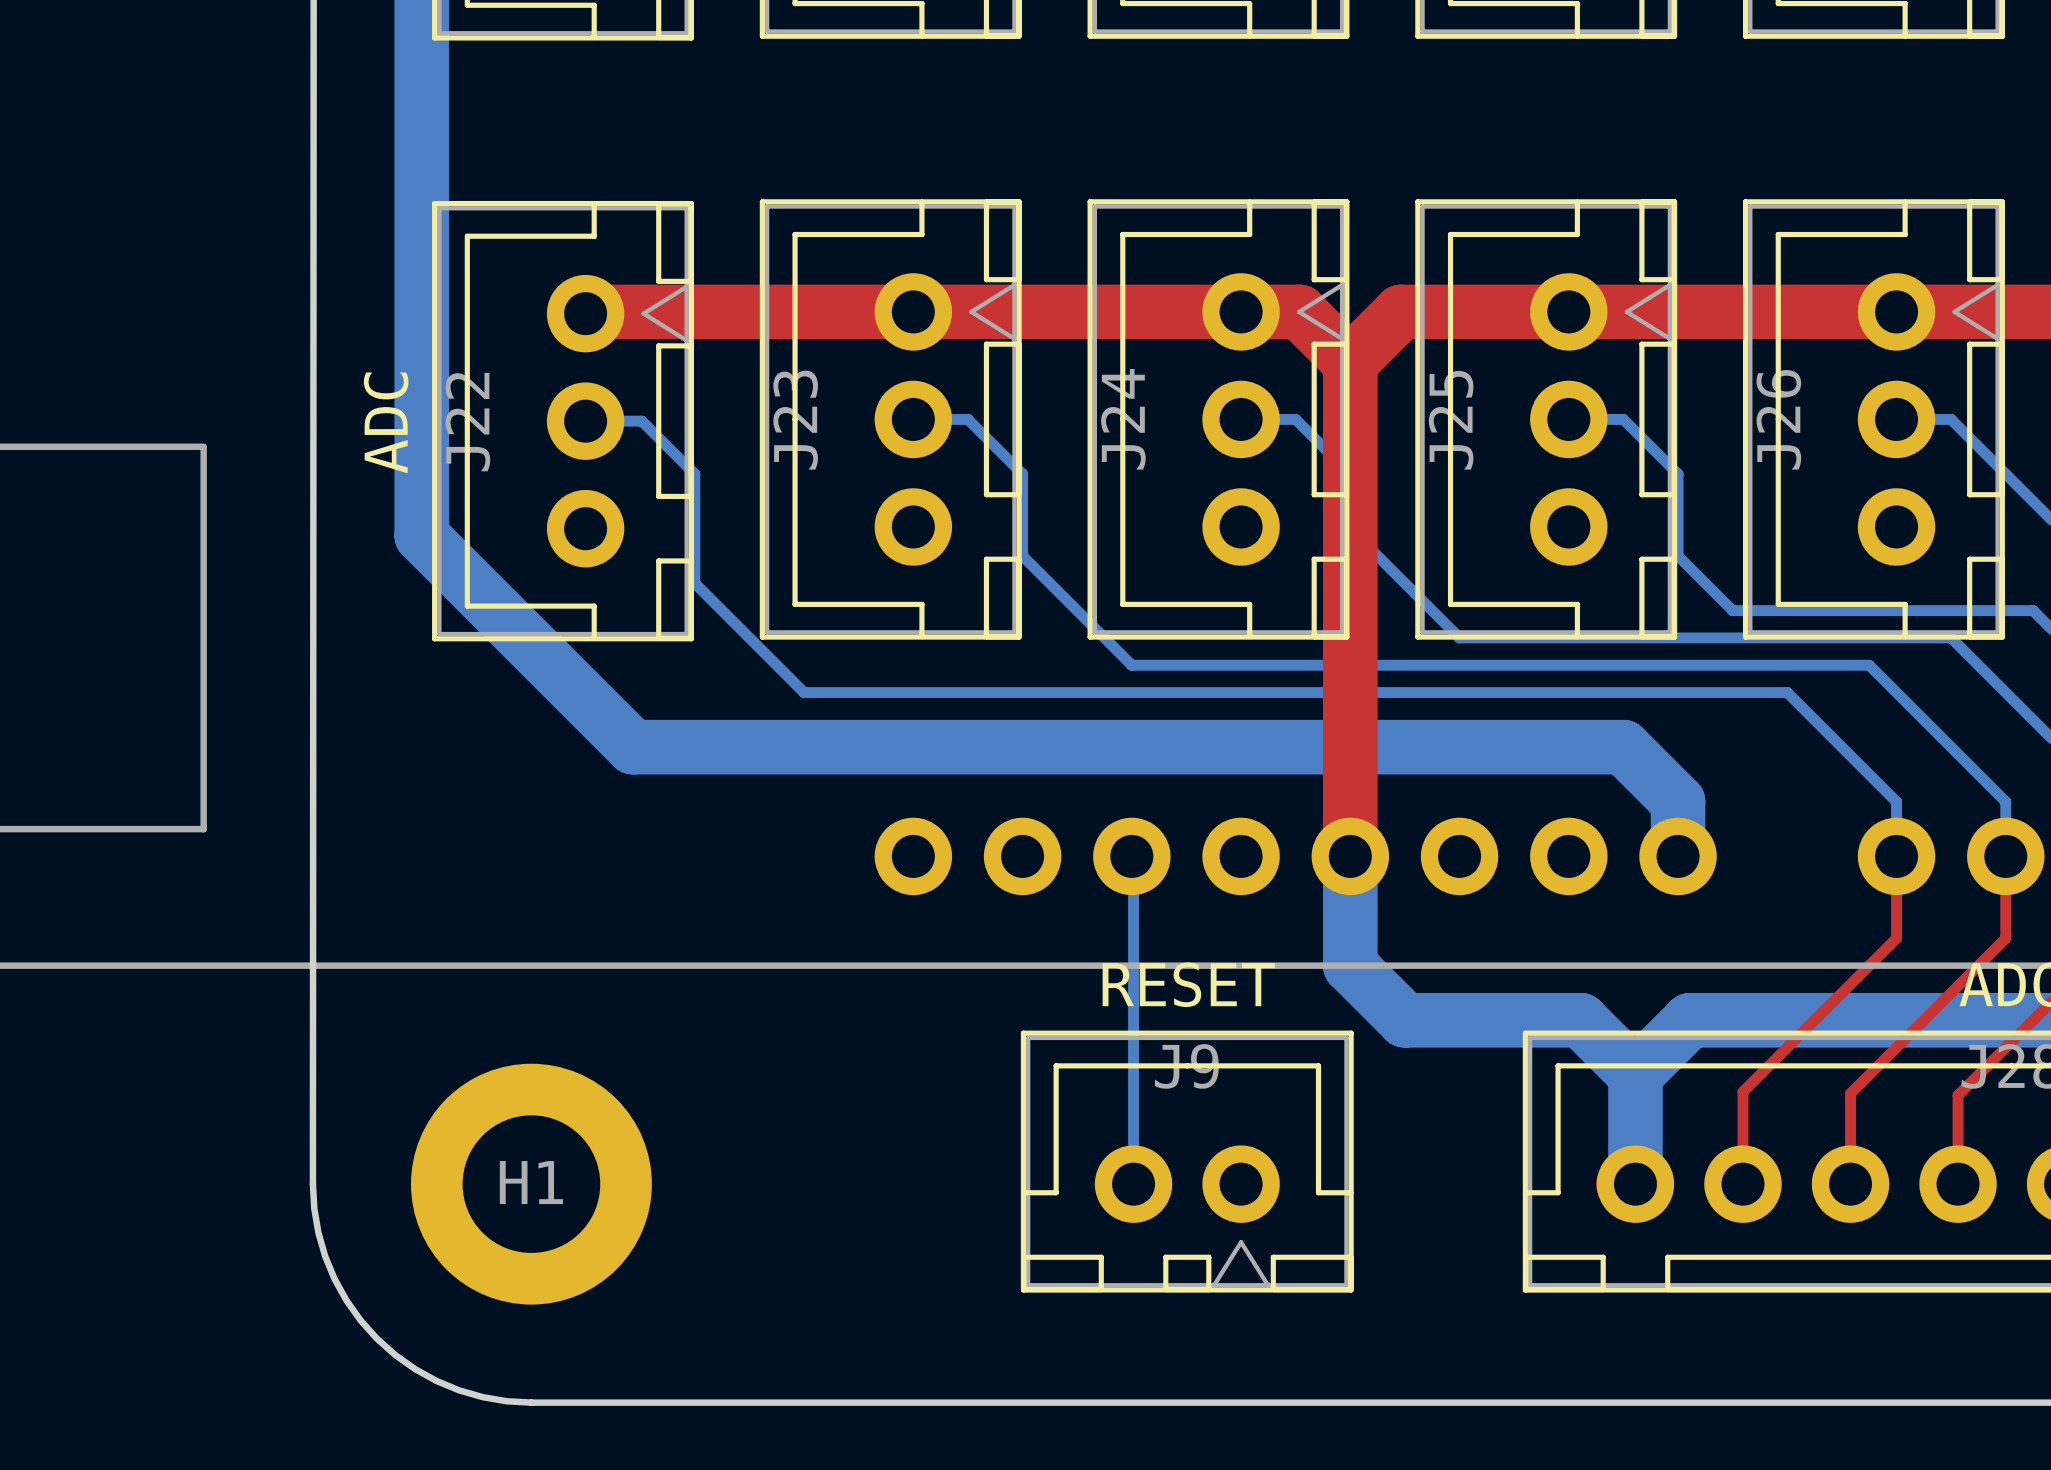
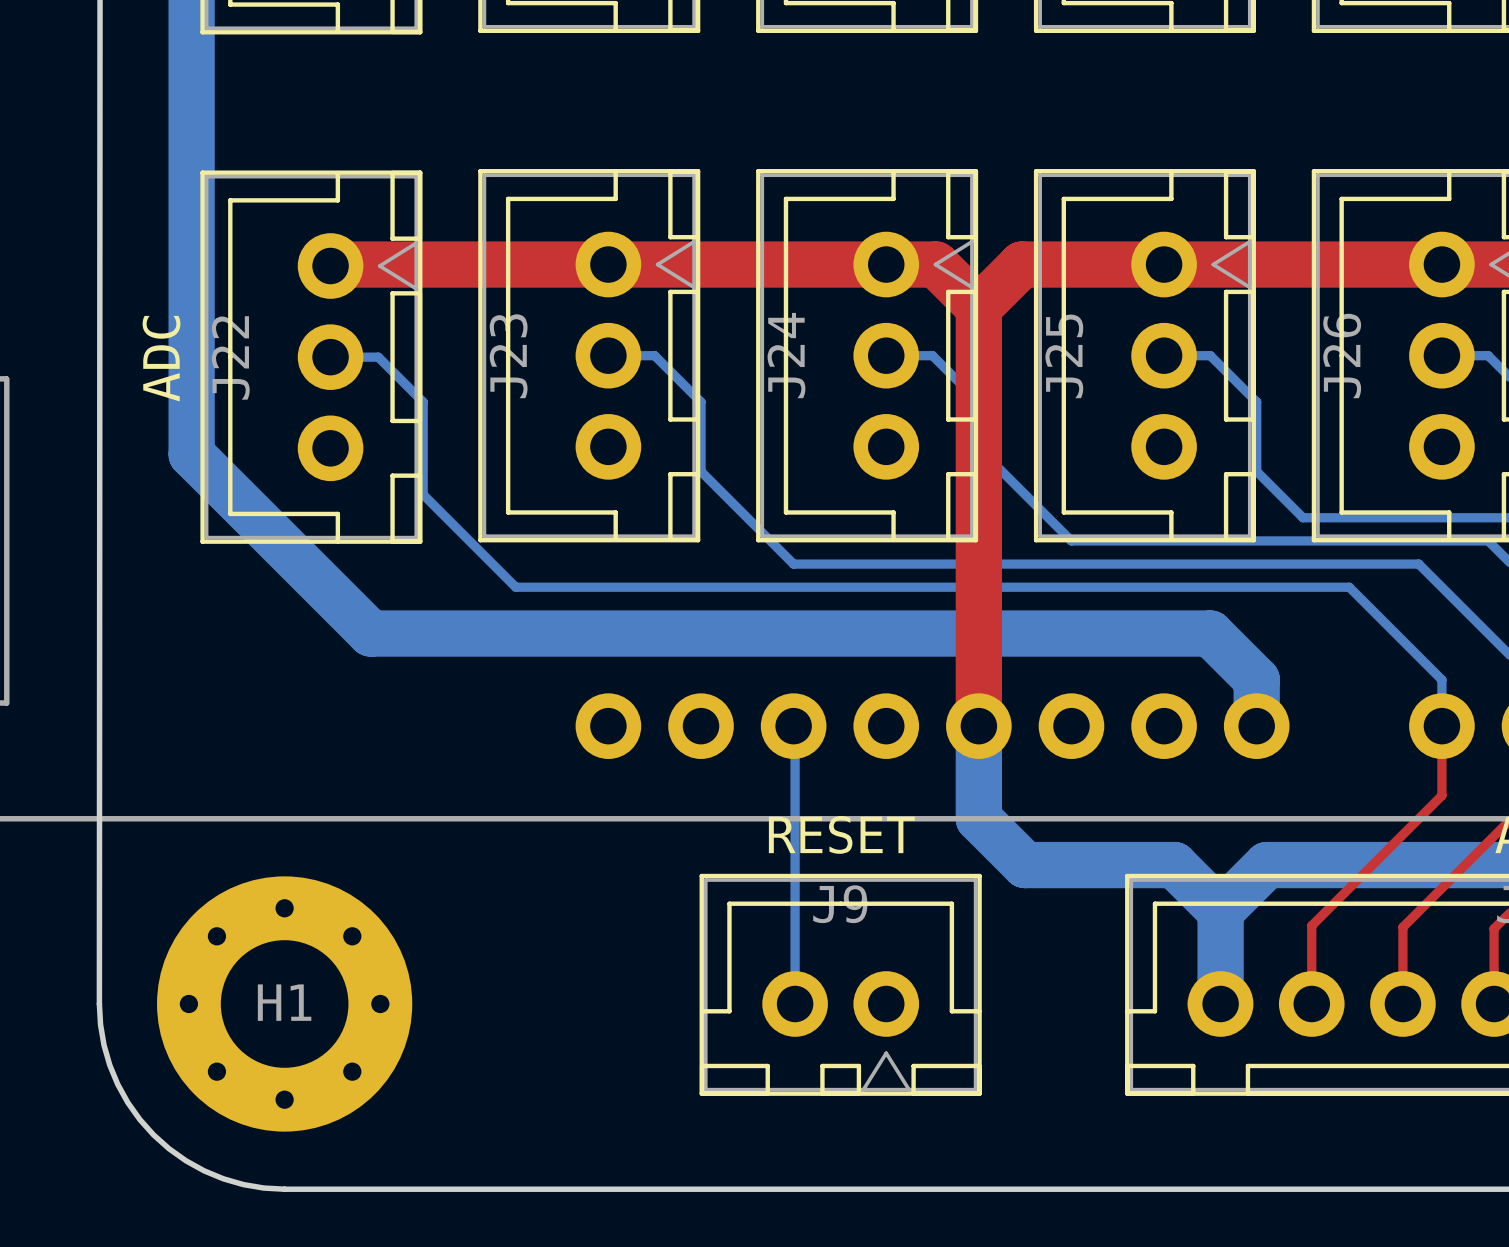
H1 footprint: [410, 1063, 652, 1305] -> [157, 876, 413, 1132]

